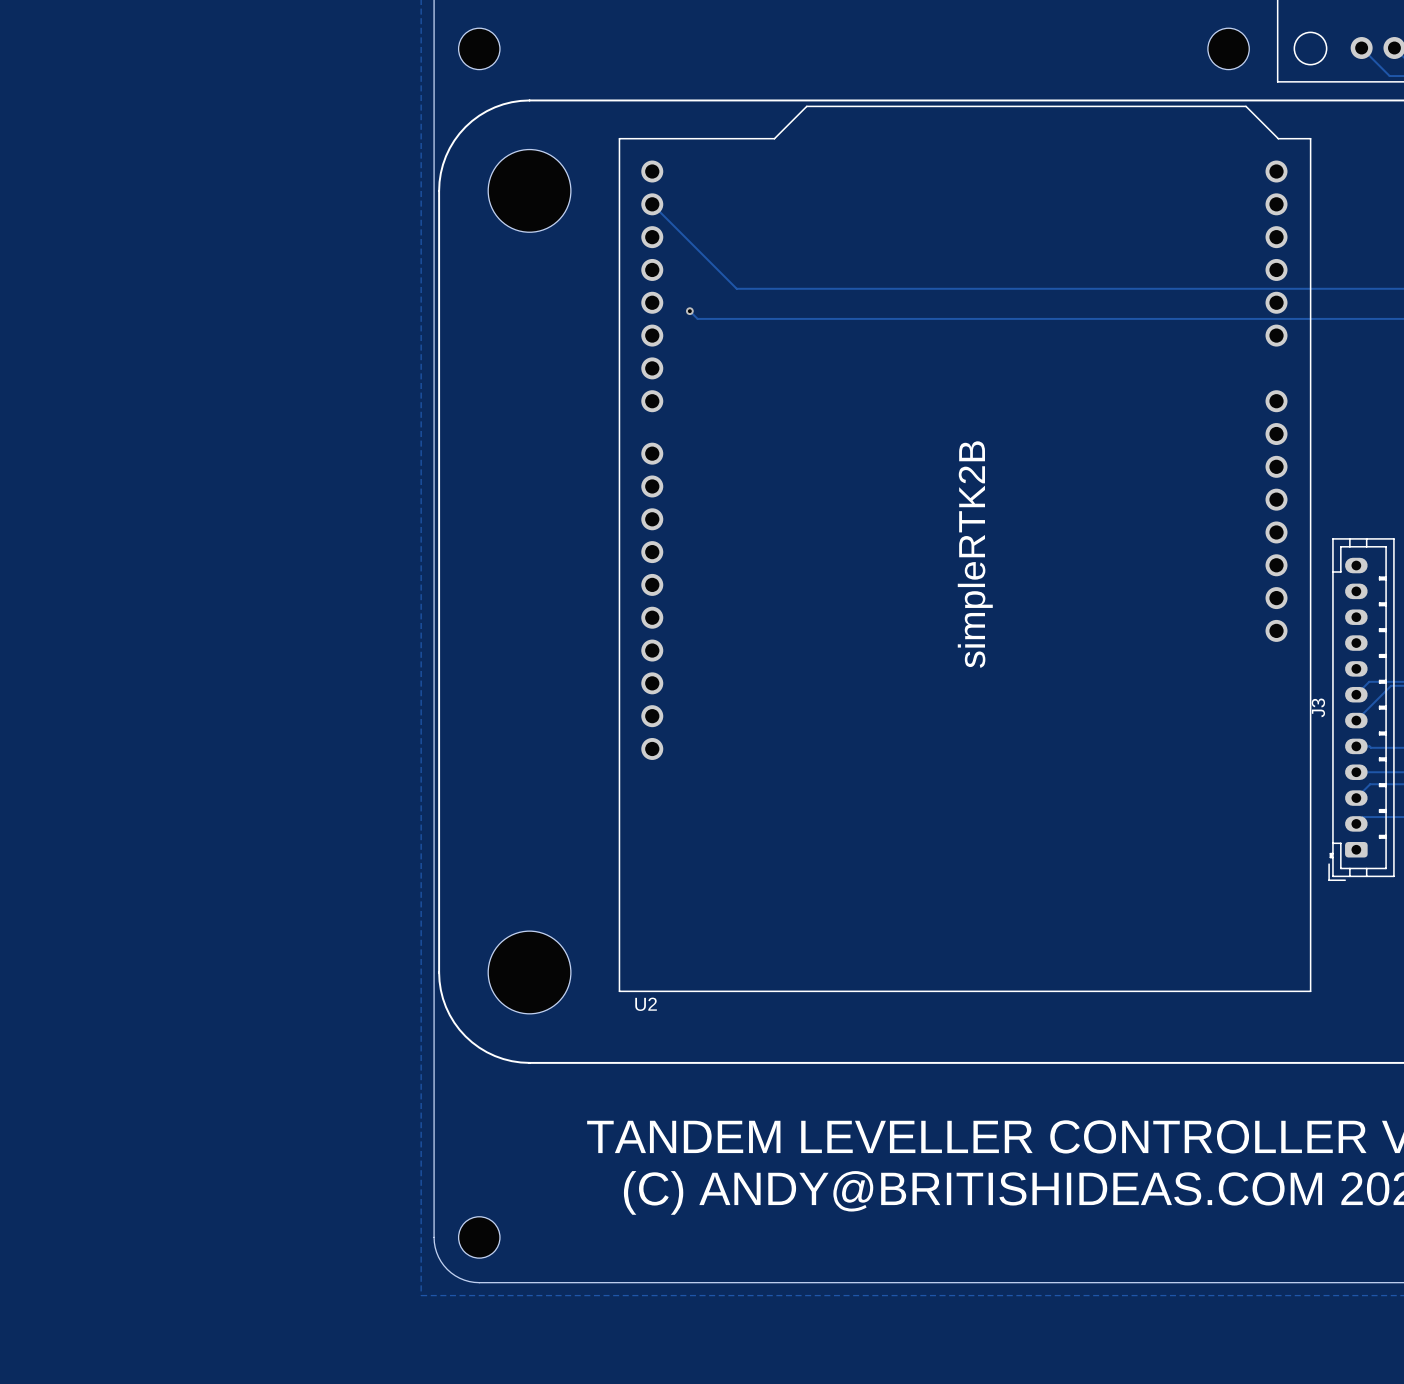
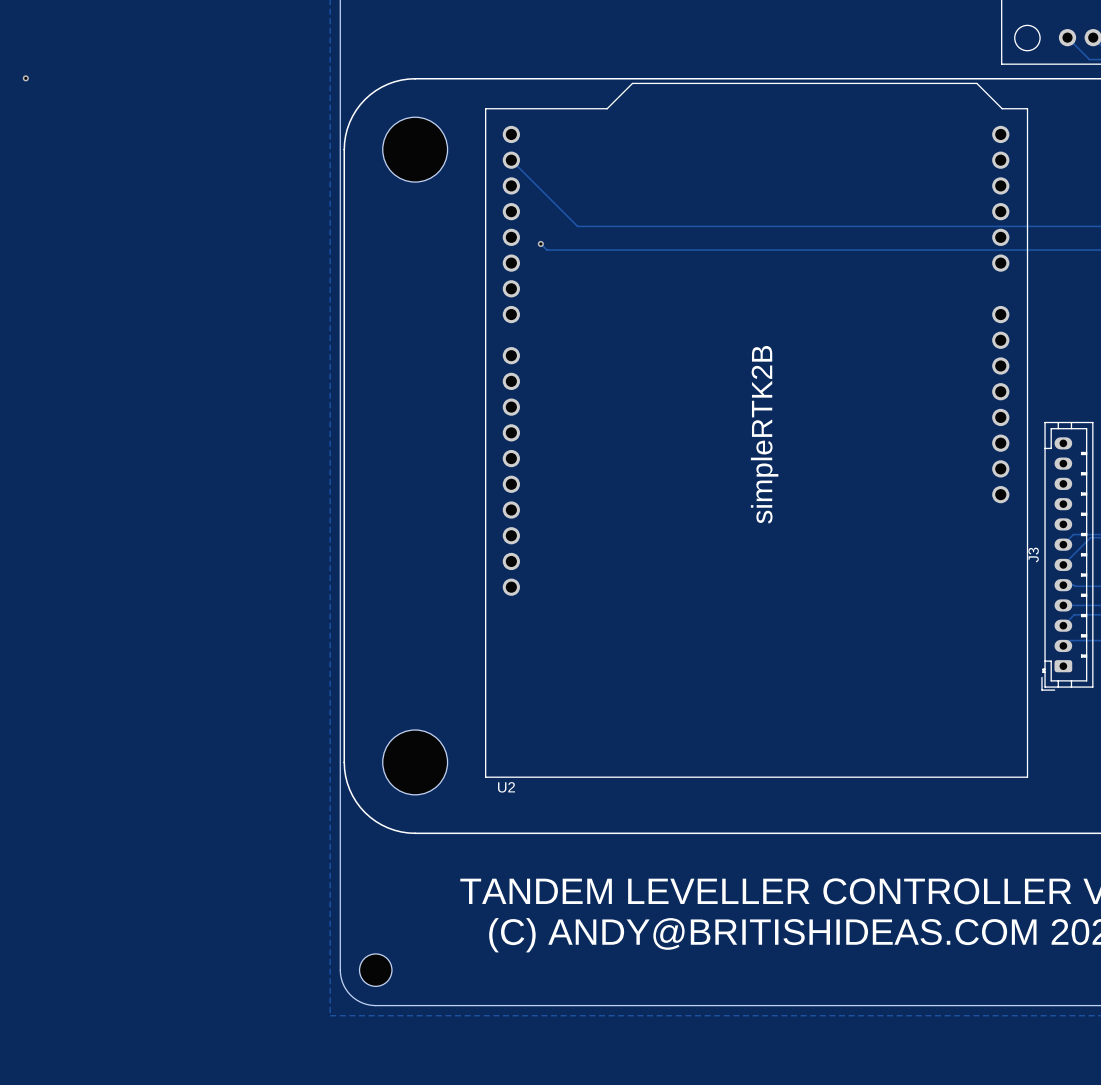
part: (479, 48) -> none
part: (1228, 48) -> none
via: none -> (25, 78)

